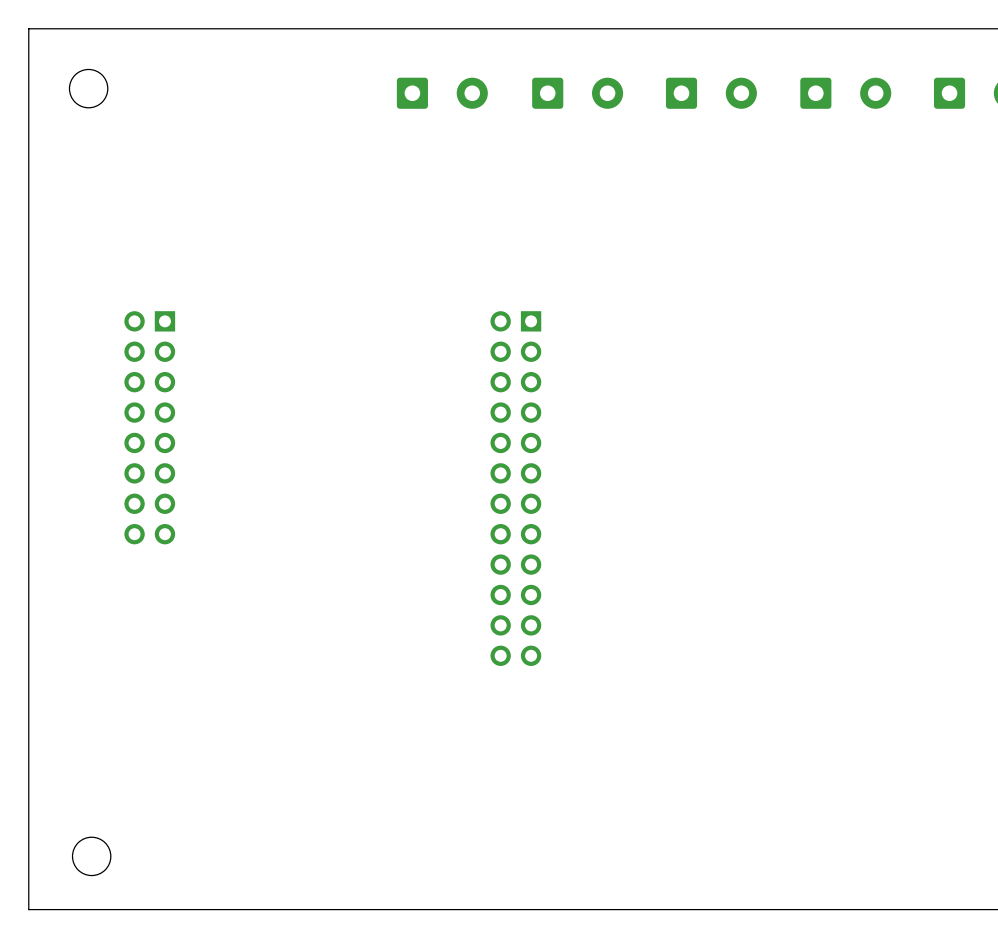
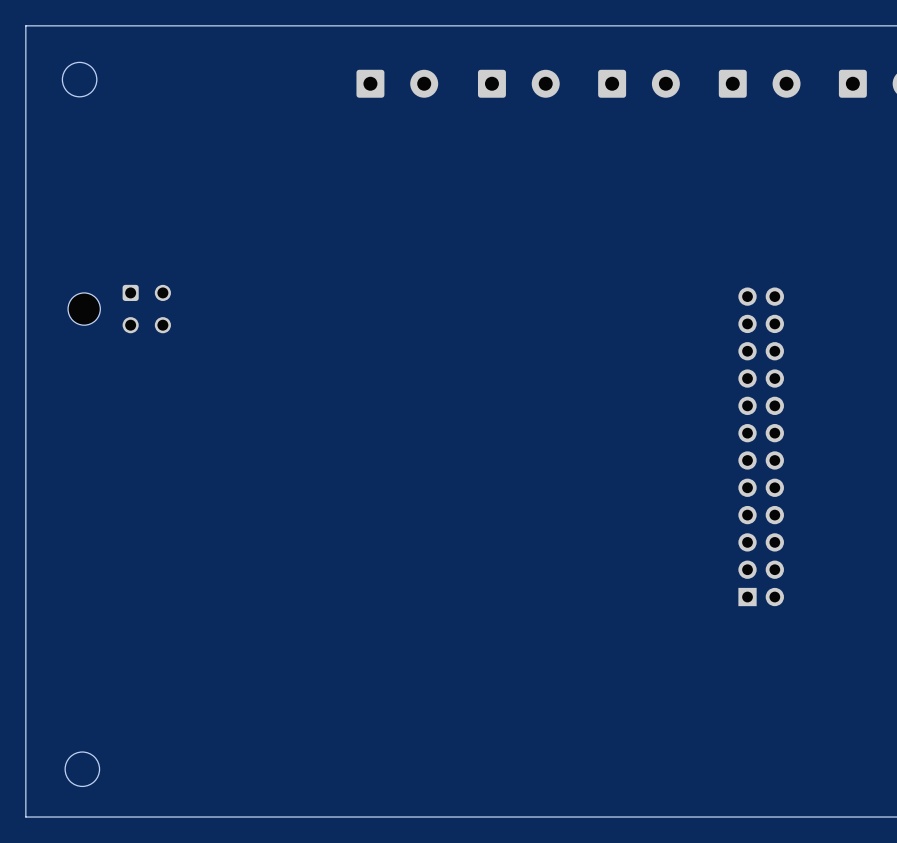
part: none -> (119, 309)
part: (149, 427) -> none
part: (515, 488) -> none
part: none -> (761, 446)

